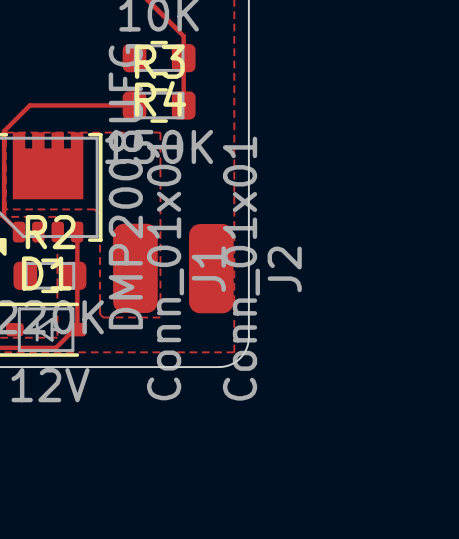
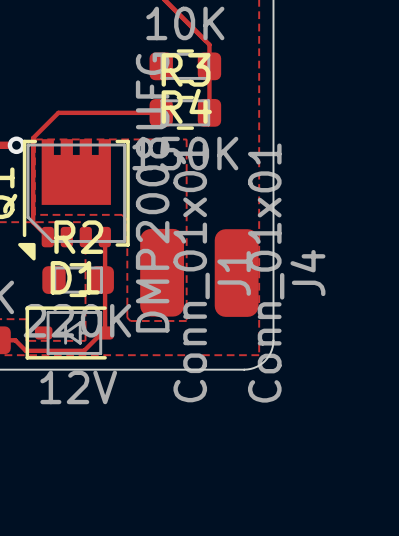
J2 name: J2 (284, 269) -> J4 (307, 273)

